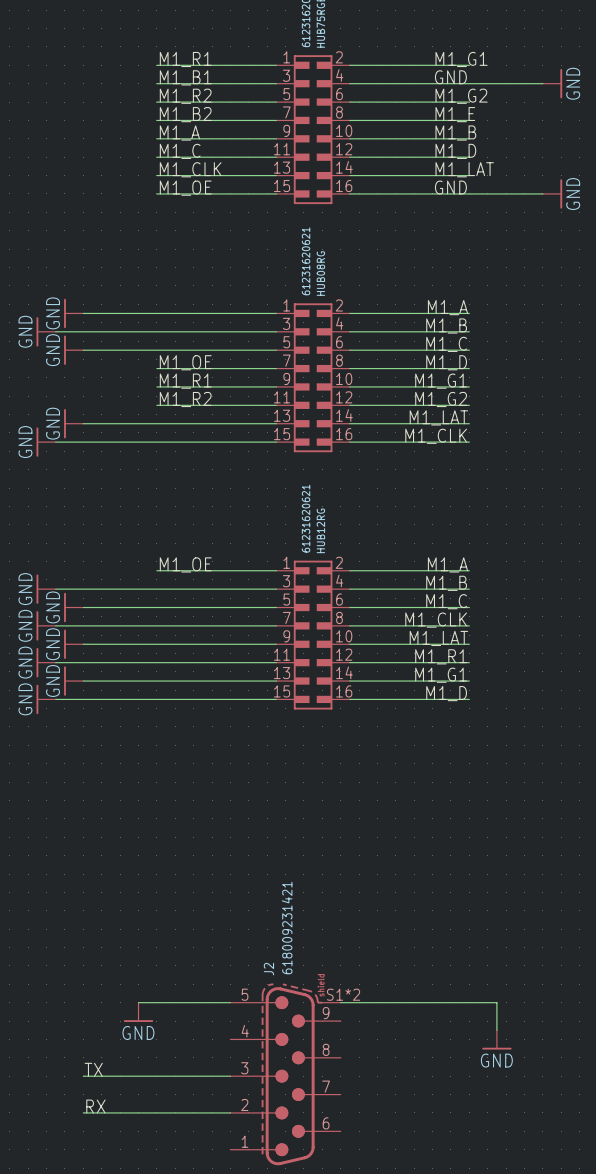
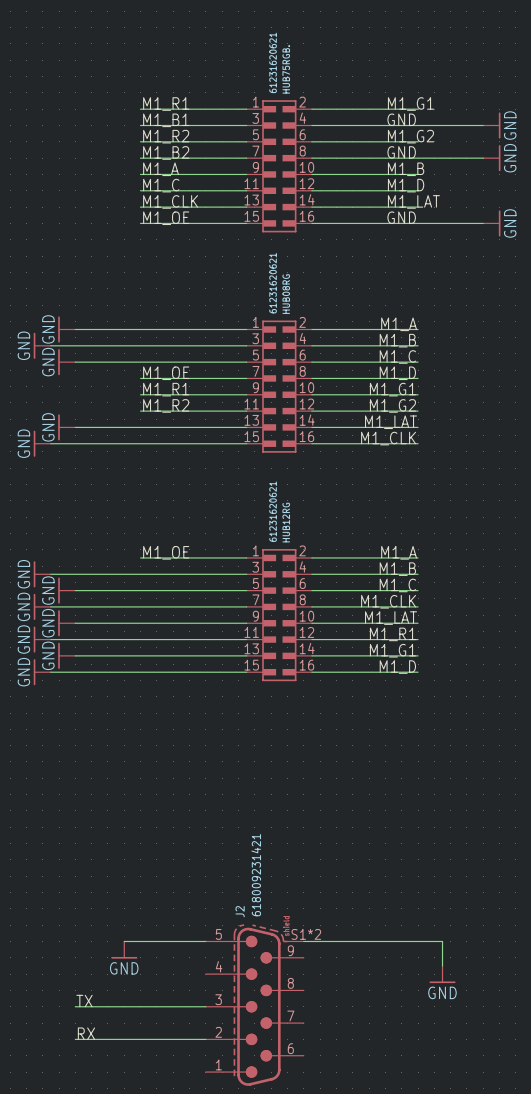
label: M1_E (455, 114) -> GND (401, 152)
wire: none -> (418, 158) (483, 158)
power symbol: none -> GND (491, 158)

